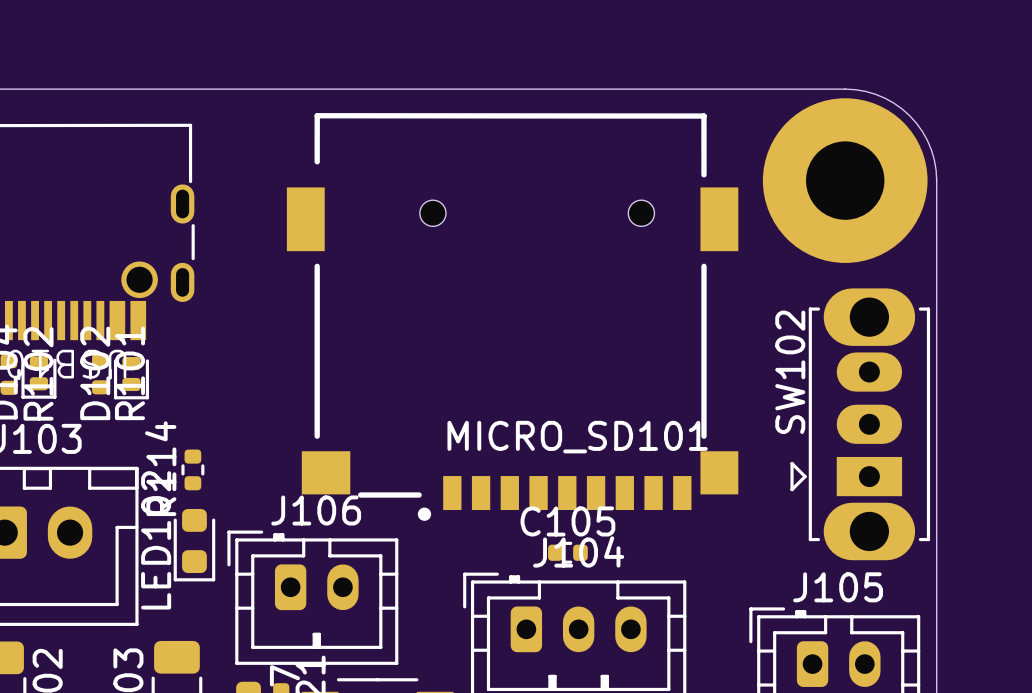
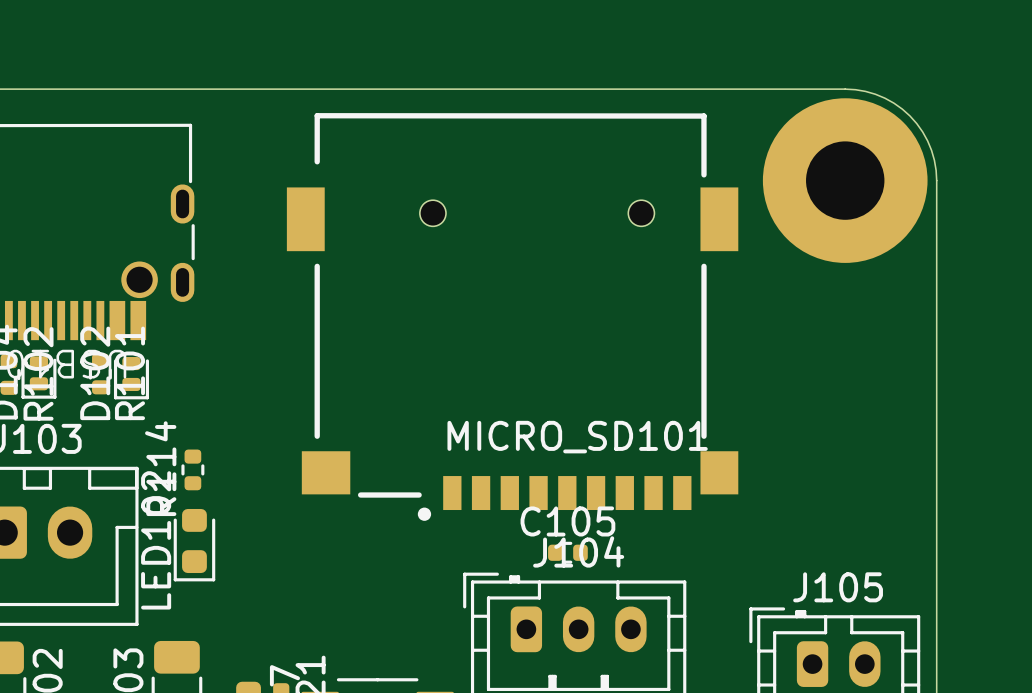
SW102: (860, 424) -> none
J106: (312, 597) -> none

